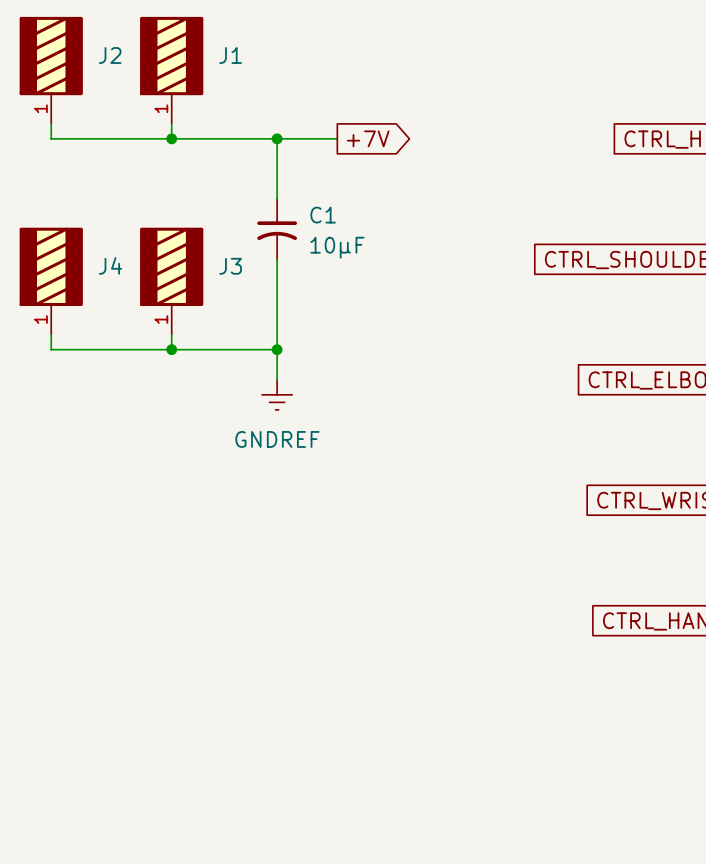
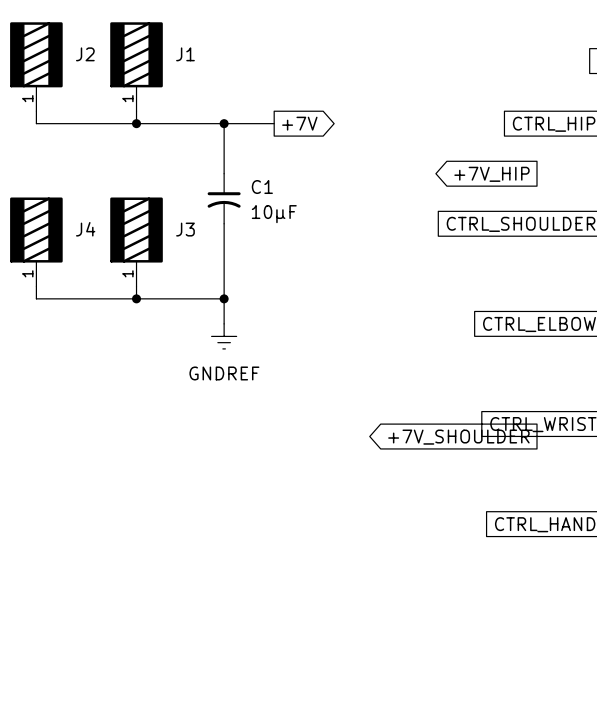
global label: none -> +7V_HIP (491, 174)
global label: none -> +7V_SHOULDER (458, 437)

